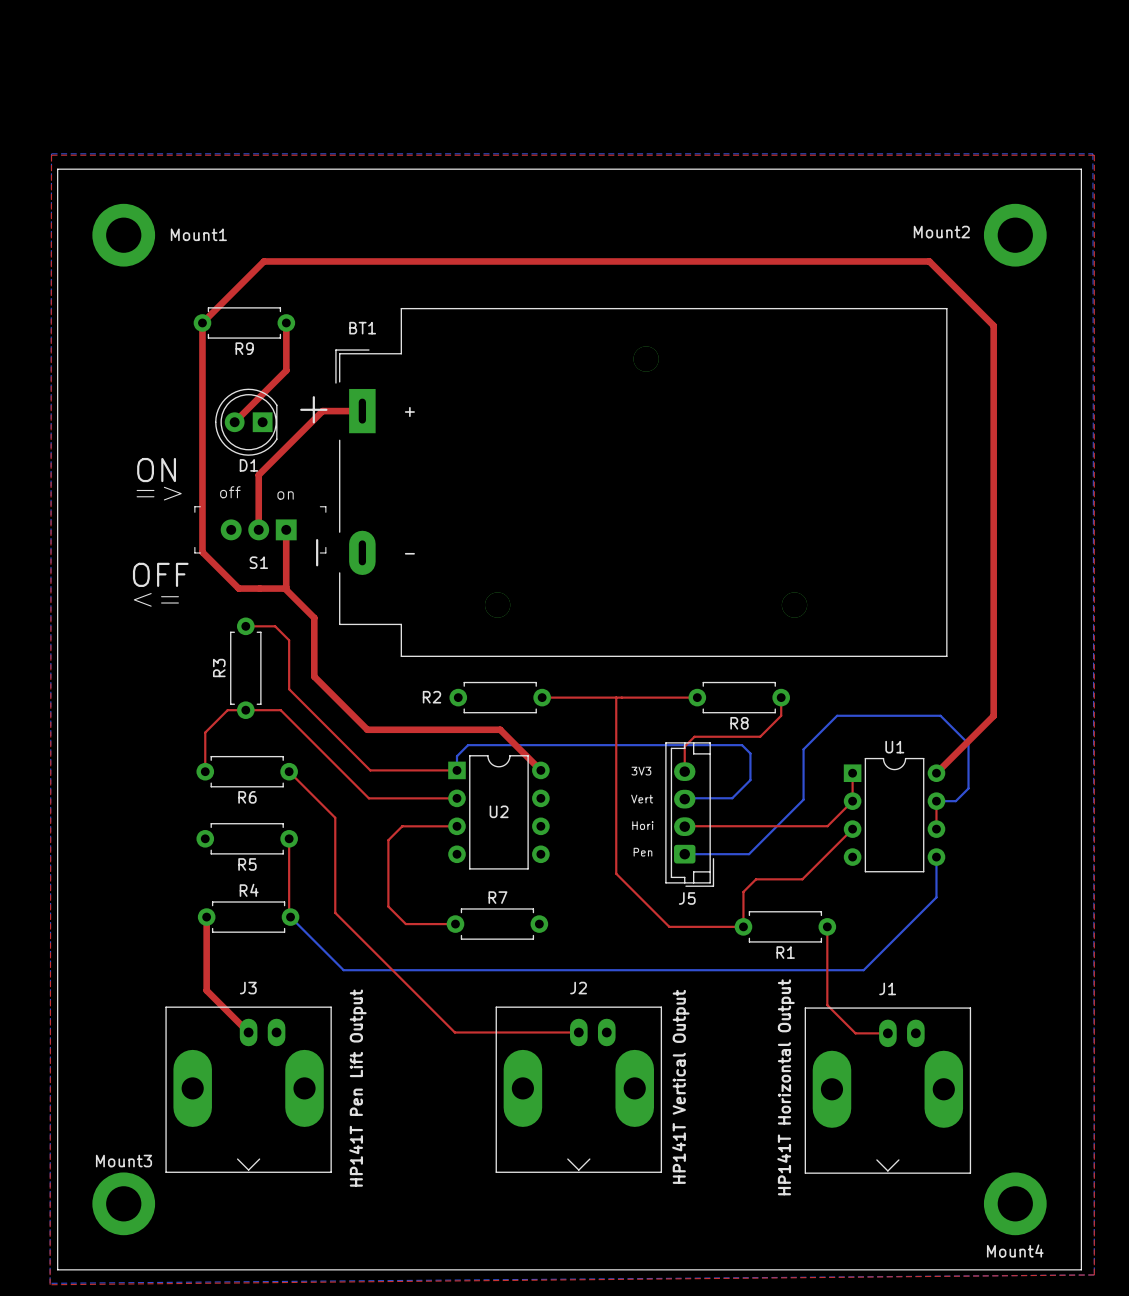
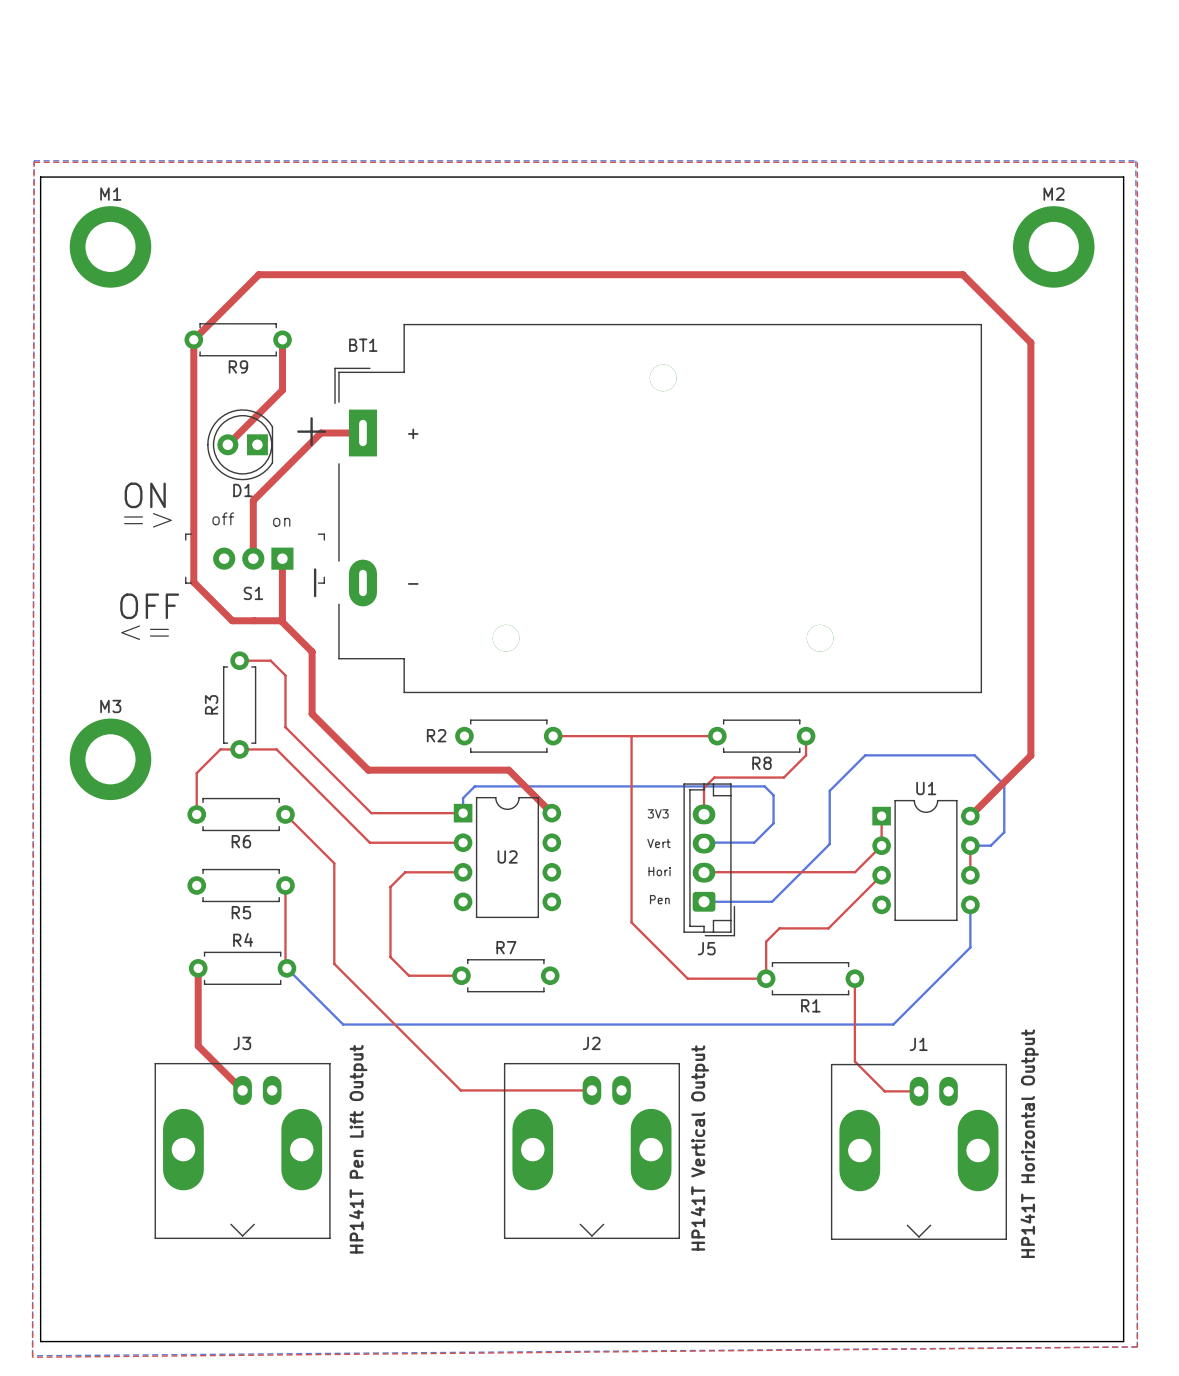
Mount1: (123, 235) -> none
M1: none -> (110, 246)
Mount2: (1015, 235) -> none
M2: none -> (1053, 246)
M3: none -> (110, 759)
text position: HP141T Horizontal Output (786, 1087) -> HP141T Horizontal Output (1029, 1143)
Mount3: (123, 1203) -> none
Mount4: (1015, 1203) -> none

